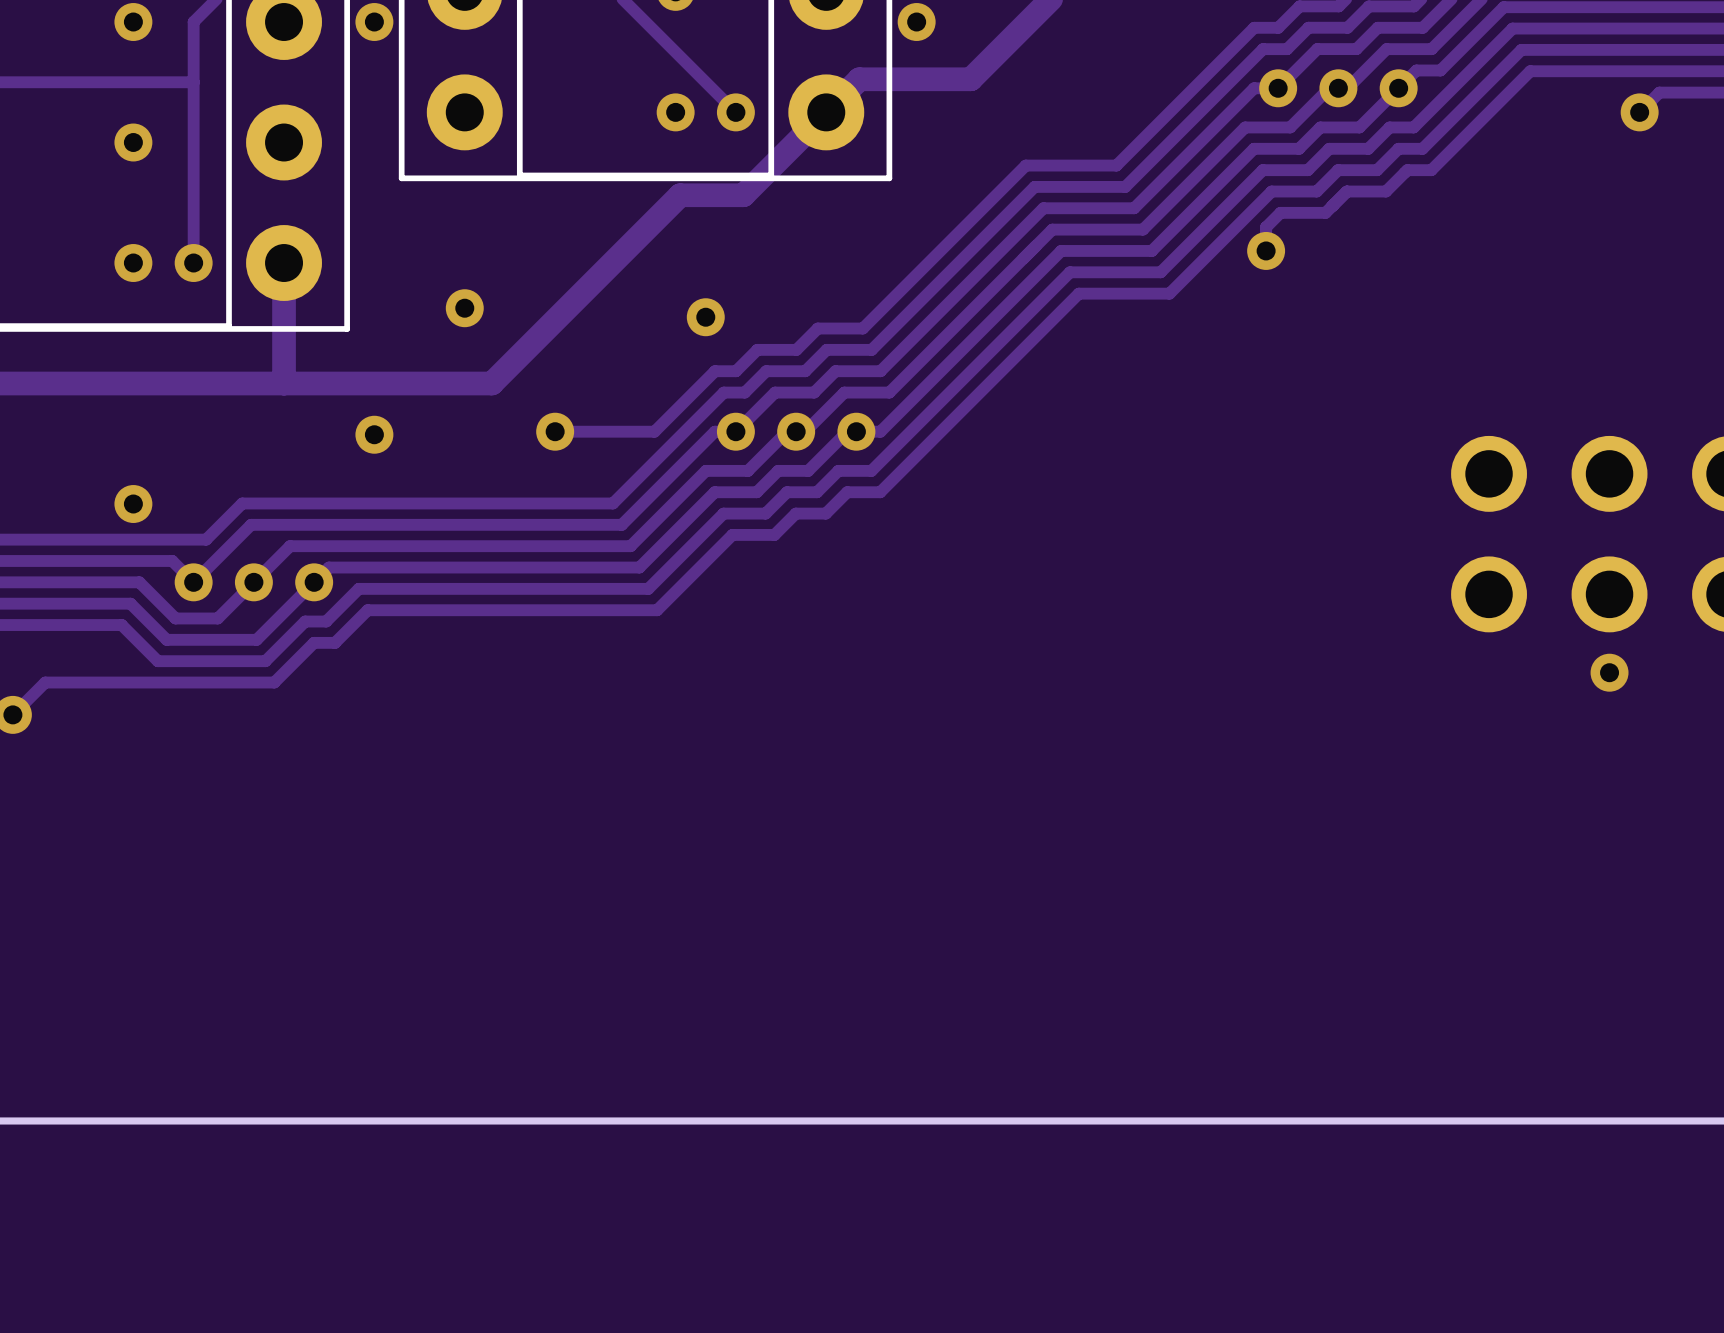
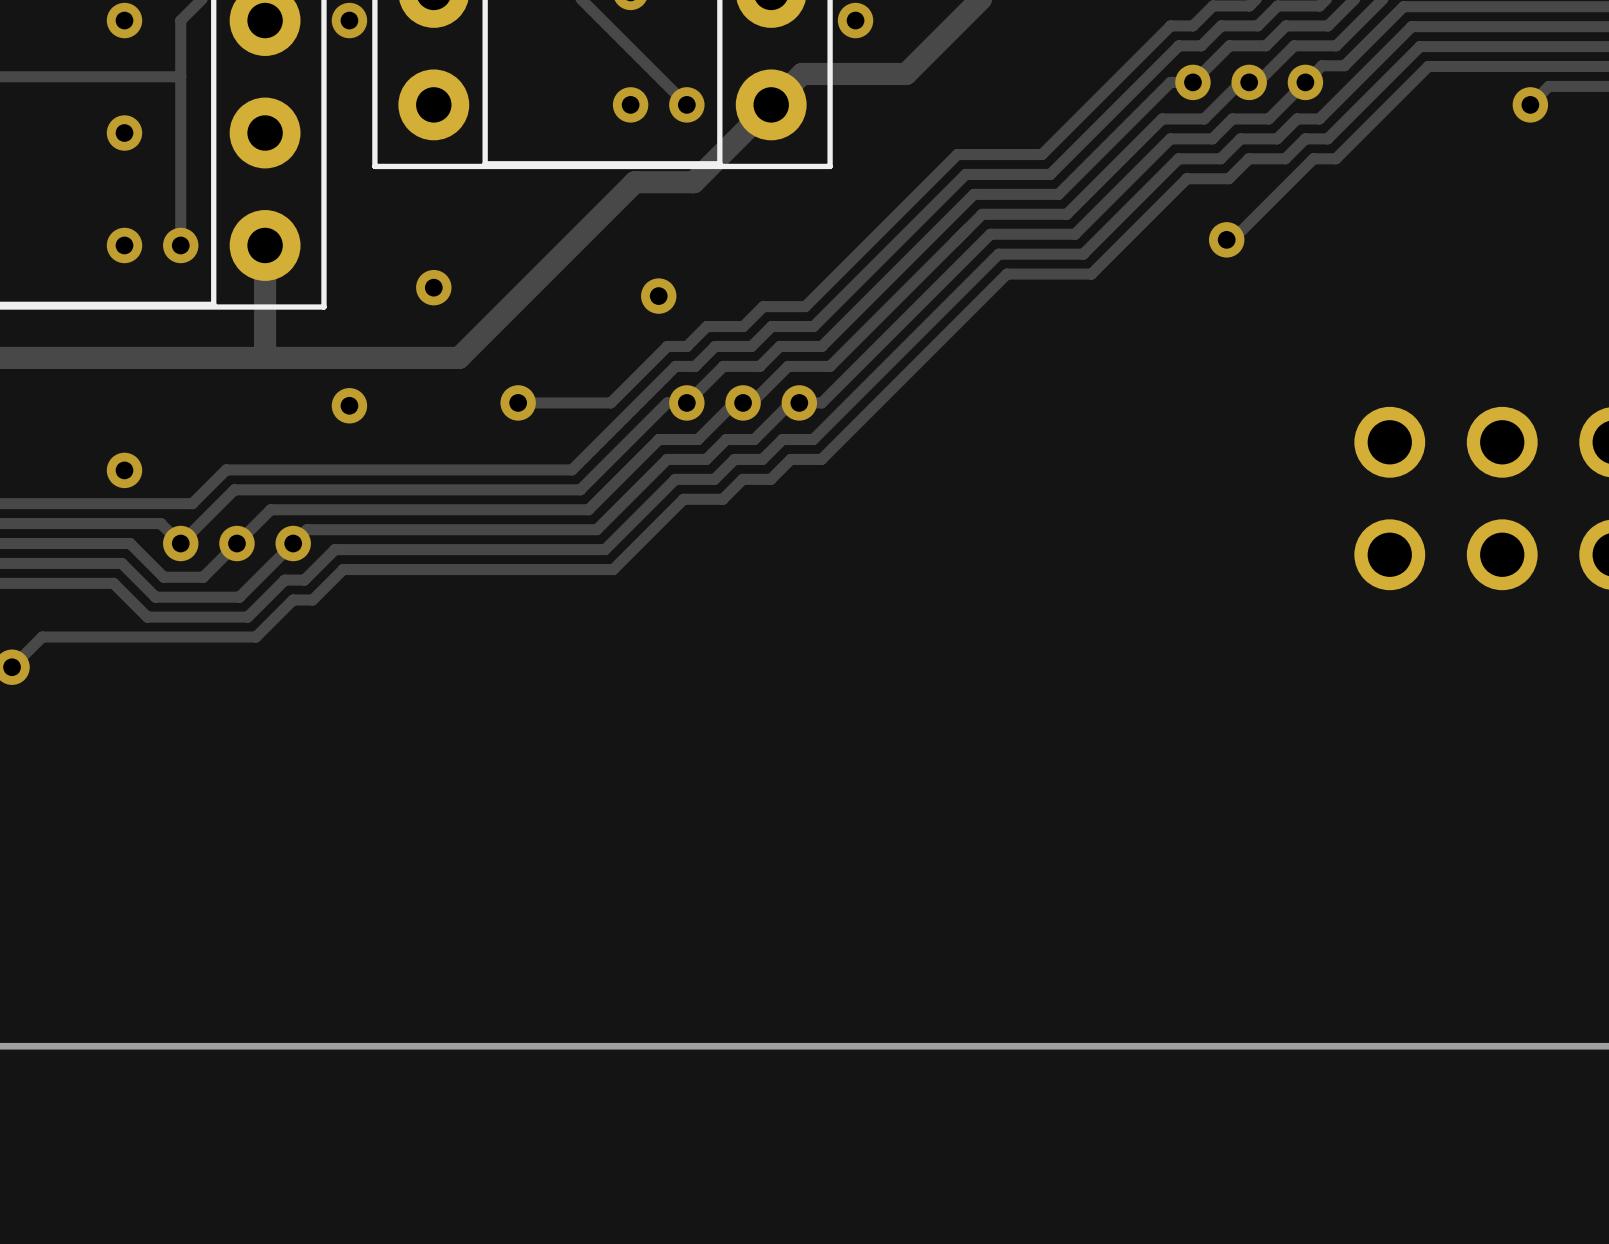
track: (1386, 191) (1346, 191) (1325, 212) (1280, 212) (1266, 227) (1266, 250) -> (1293, 178) (1232, 239) (1226, 239)
via position: (1266, 250) -> (1226, 239)
via: (1609, 672) -> none

